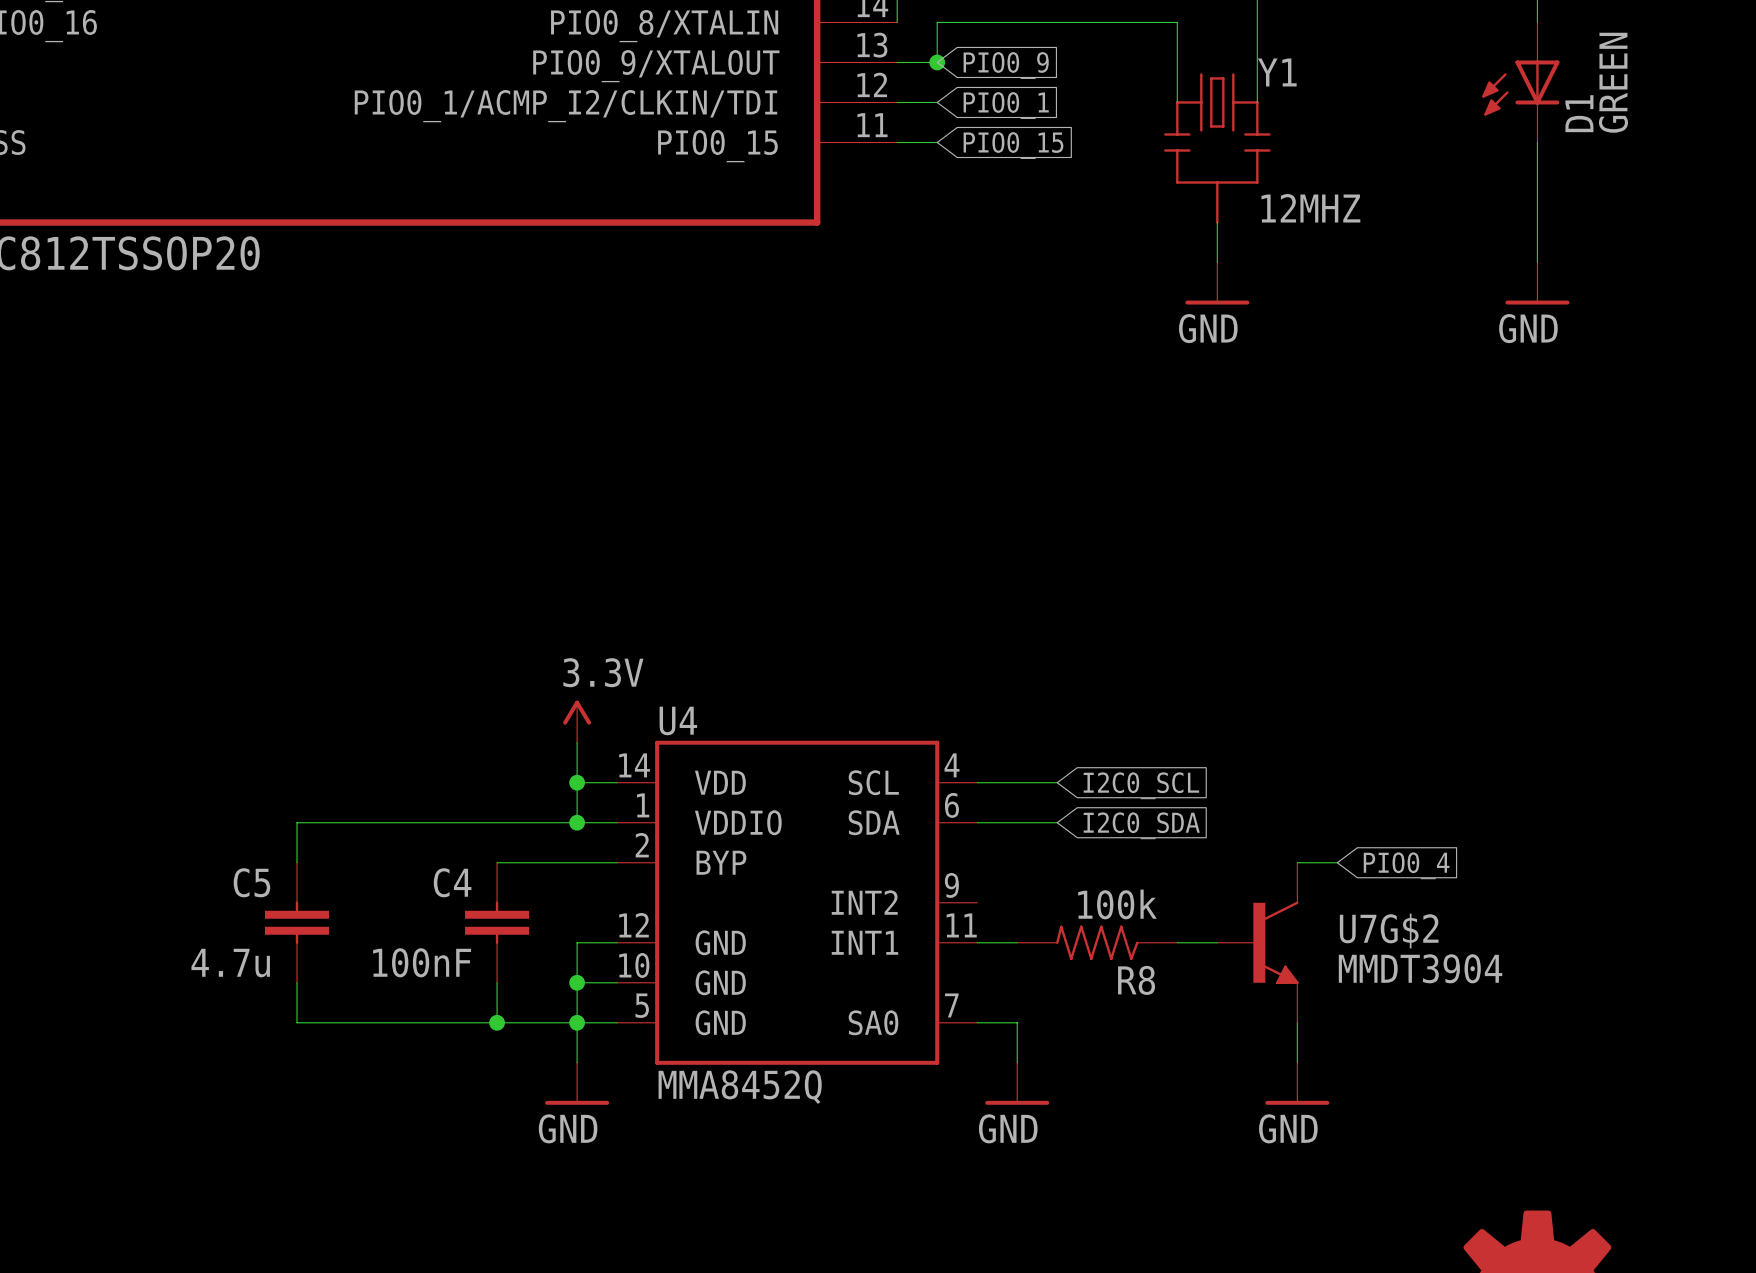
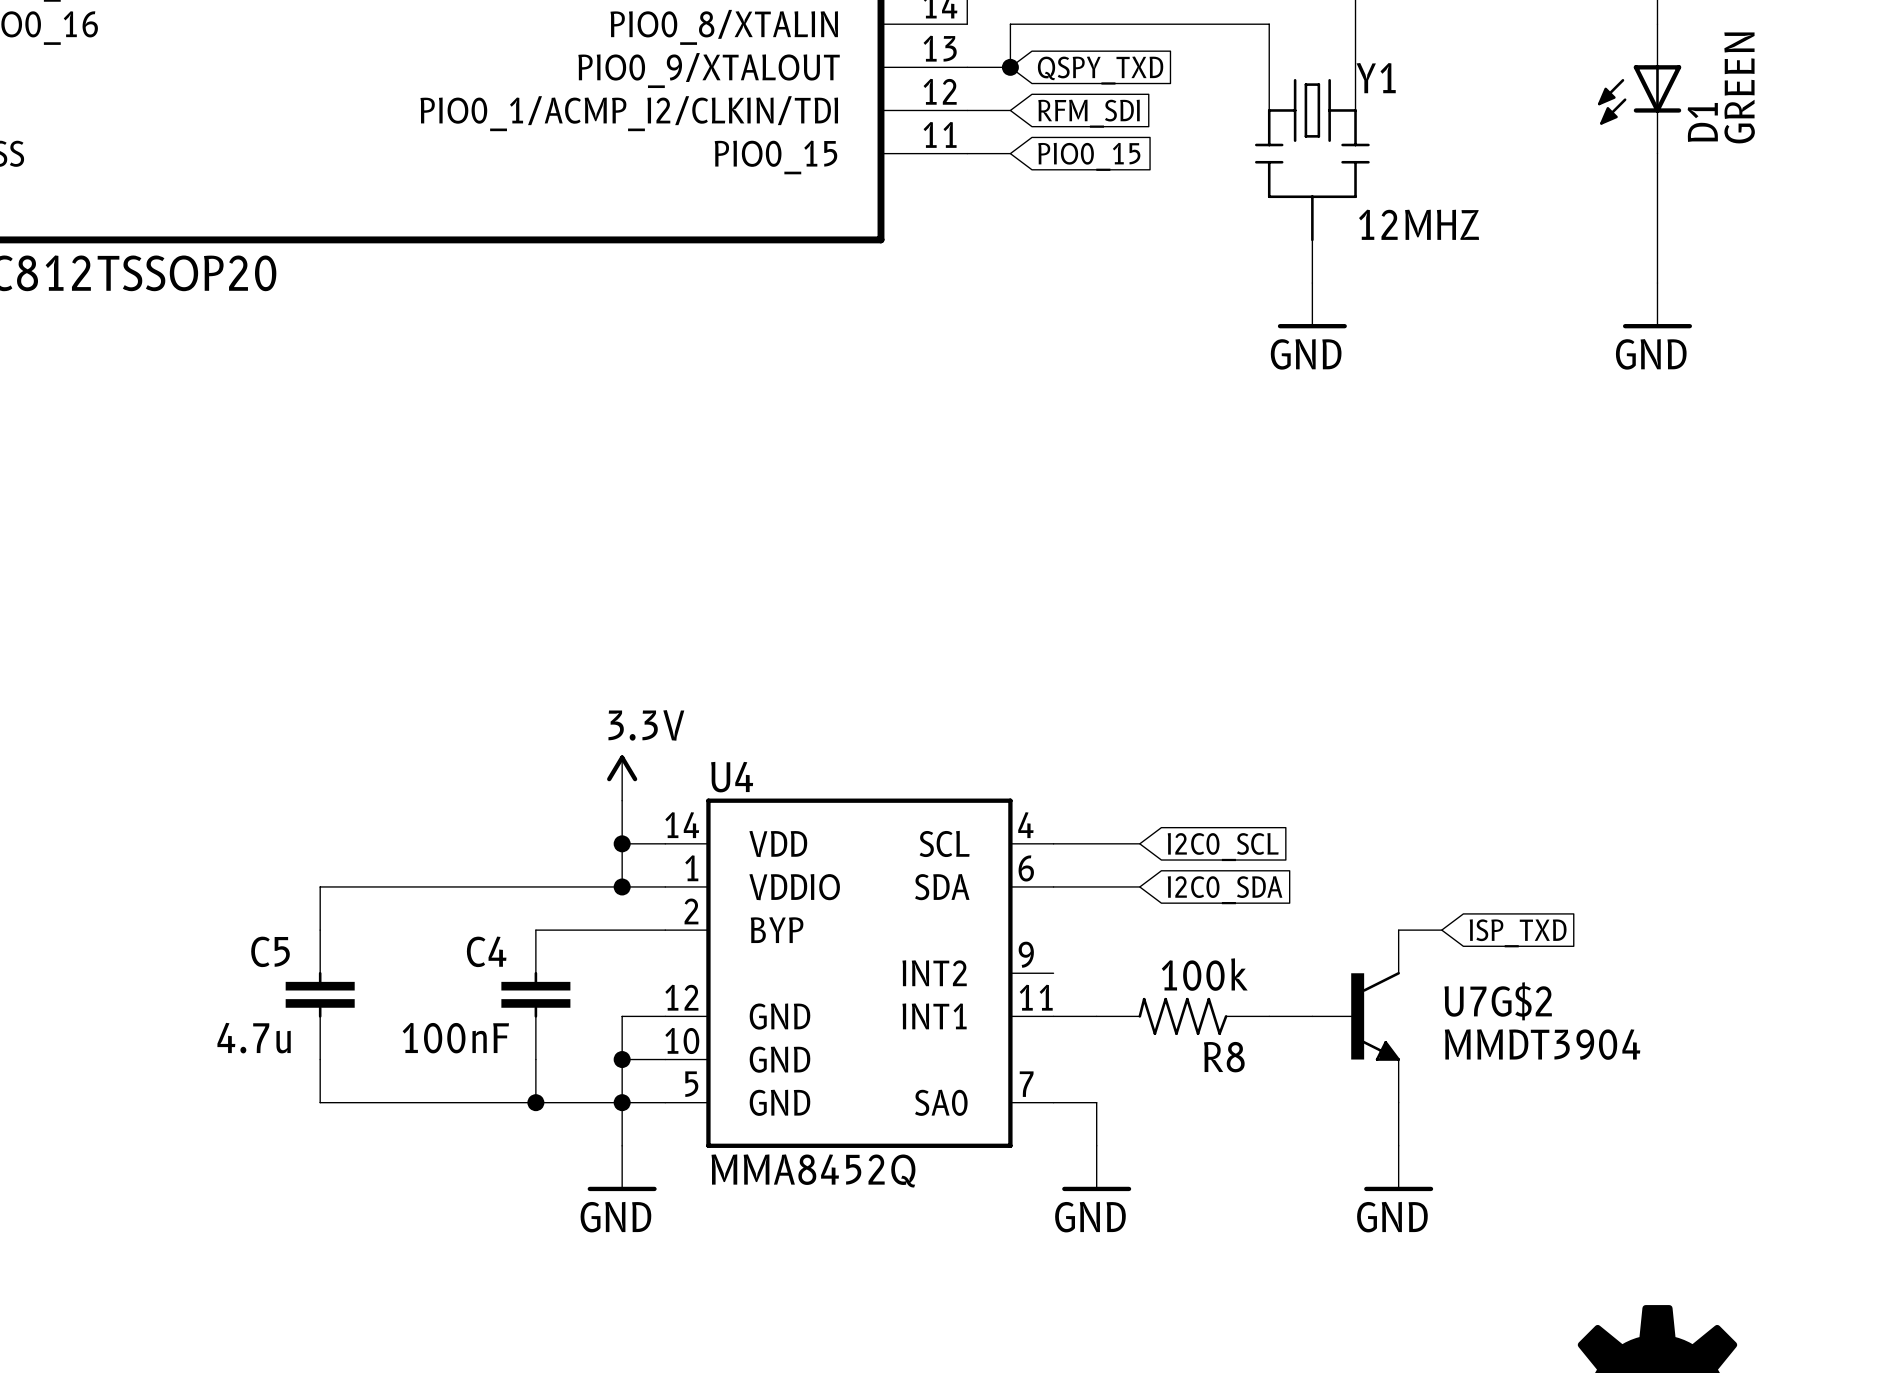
global label: PIO0_9 (1006, 65) -> QSPY_TXD (1100, 70)
global label: PIO0_1 (1006, 105) -> RFM_SDI (1089, 113)
global label: PIO0_4 (1406, 865) -> ISP_TXD (1518, 933)

